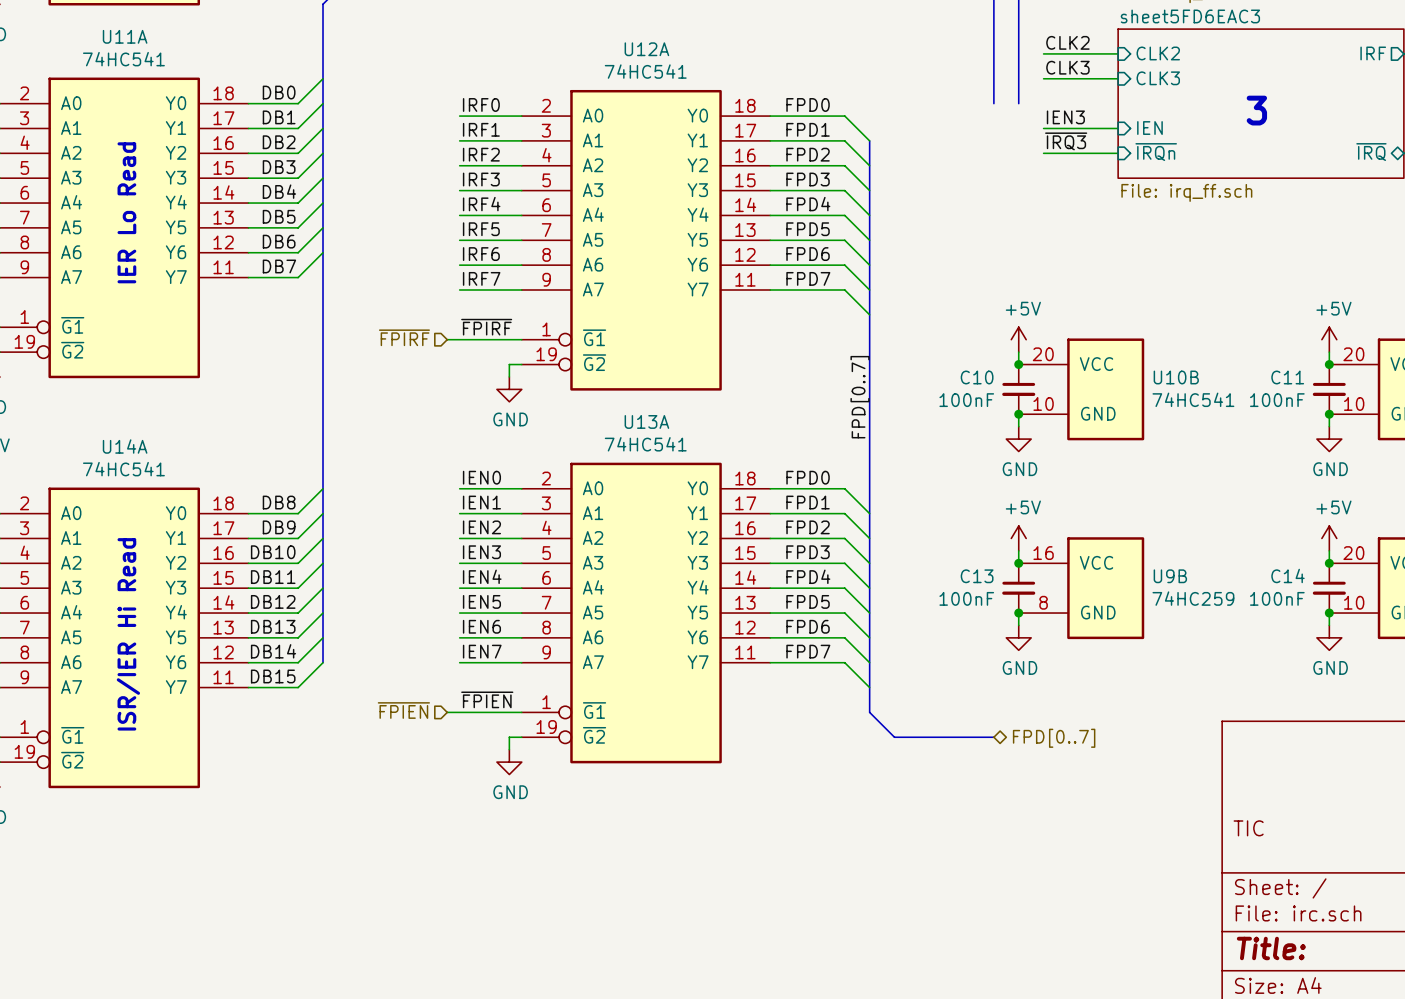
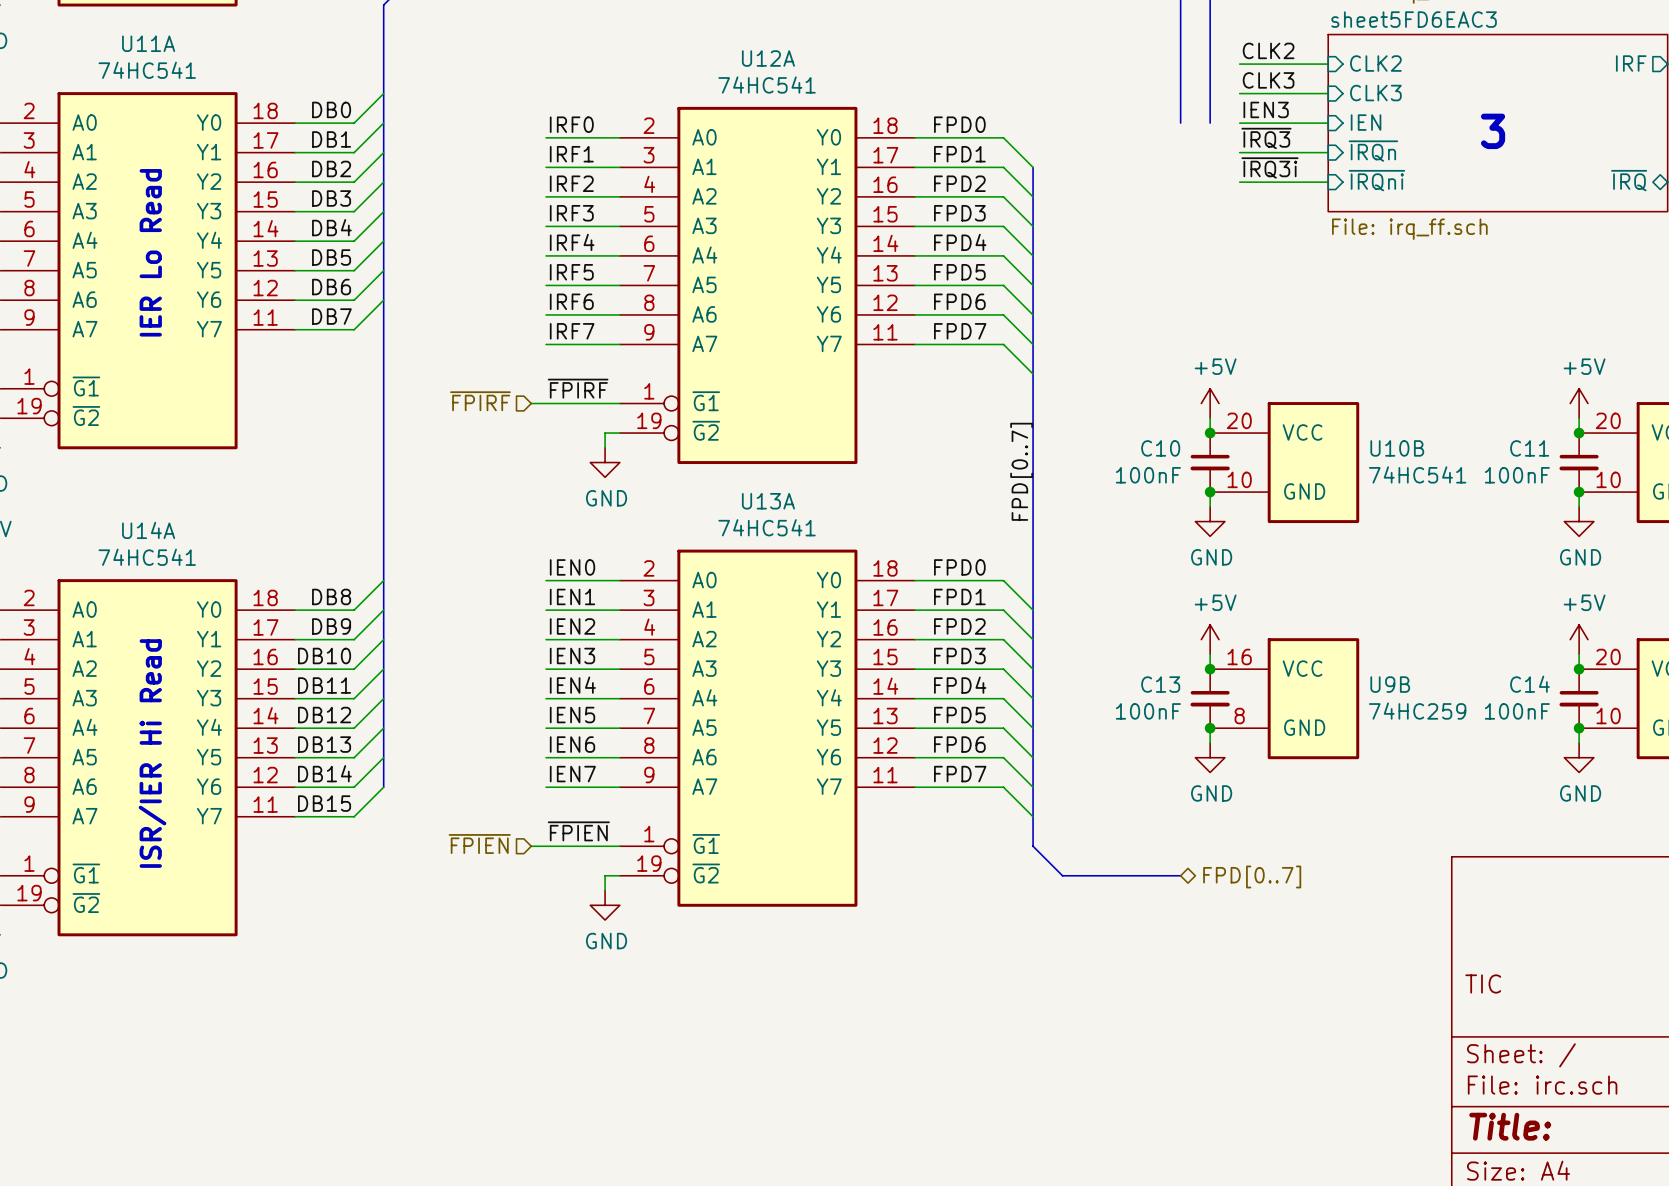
label: none -> IEN3 (1266, 109)
wire: none -> (1239, 123) (1328, 123)
sheet pin: none -> IEN (1366, 122)
label: IEN3 (1065, 117) -> ~{IRQ3} (1266, 138)
sheet pin: IEN (1149, 128) -> ~{IRQn} (1373, 151)
label: ~{IRQ3} (1066, 141) -> ~{IRQ3i} (1269, 167)
sheet pin: ~{IRQn} (1156, 152) -> ~{IRQni} (1376, 180)

